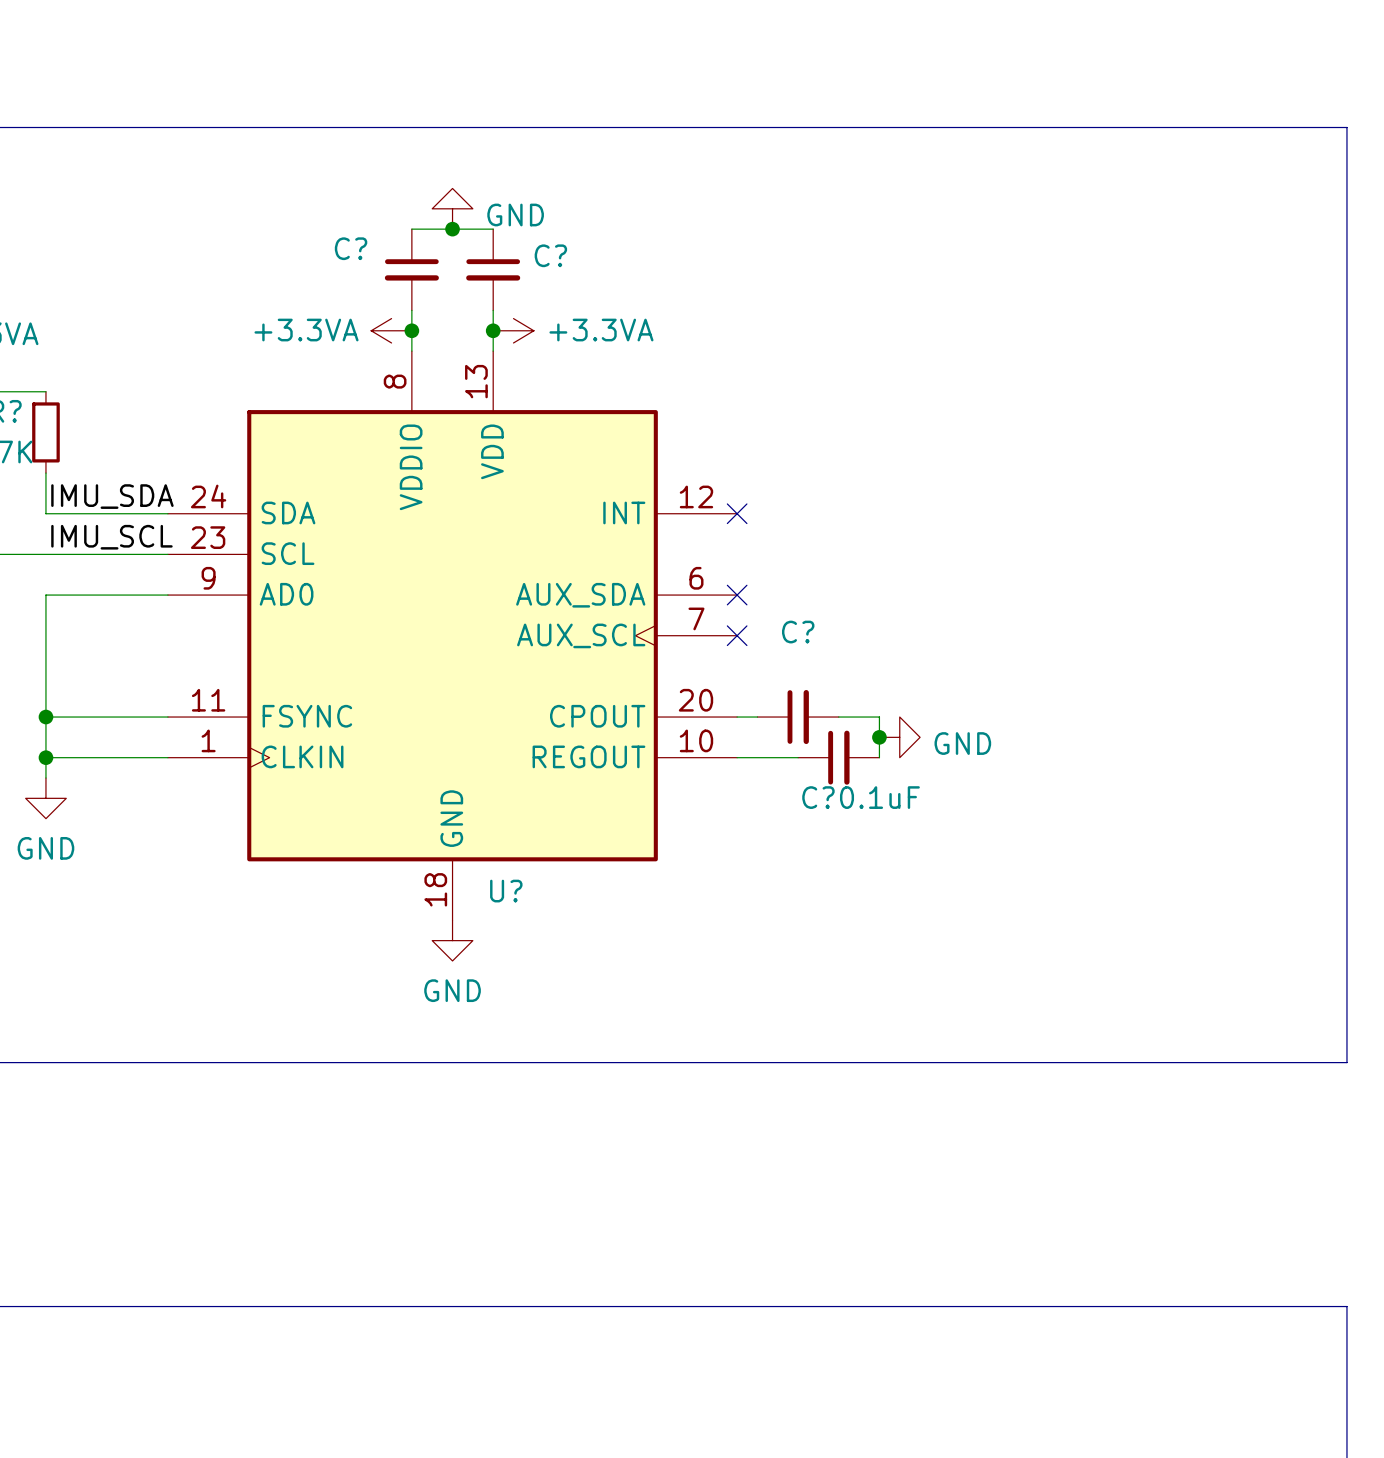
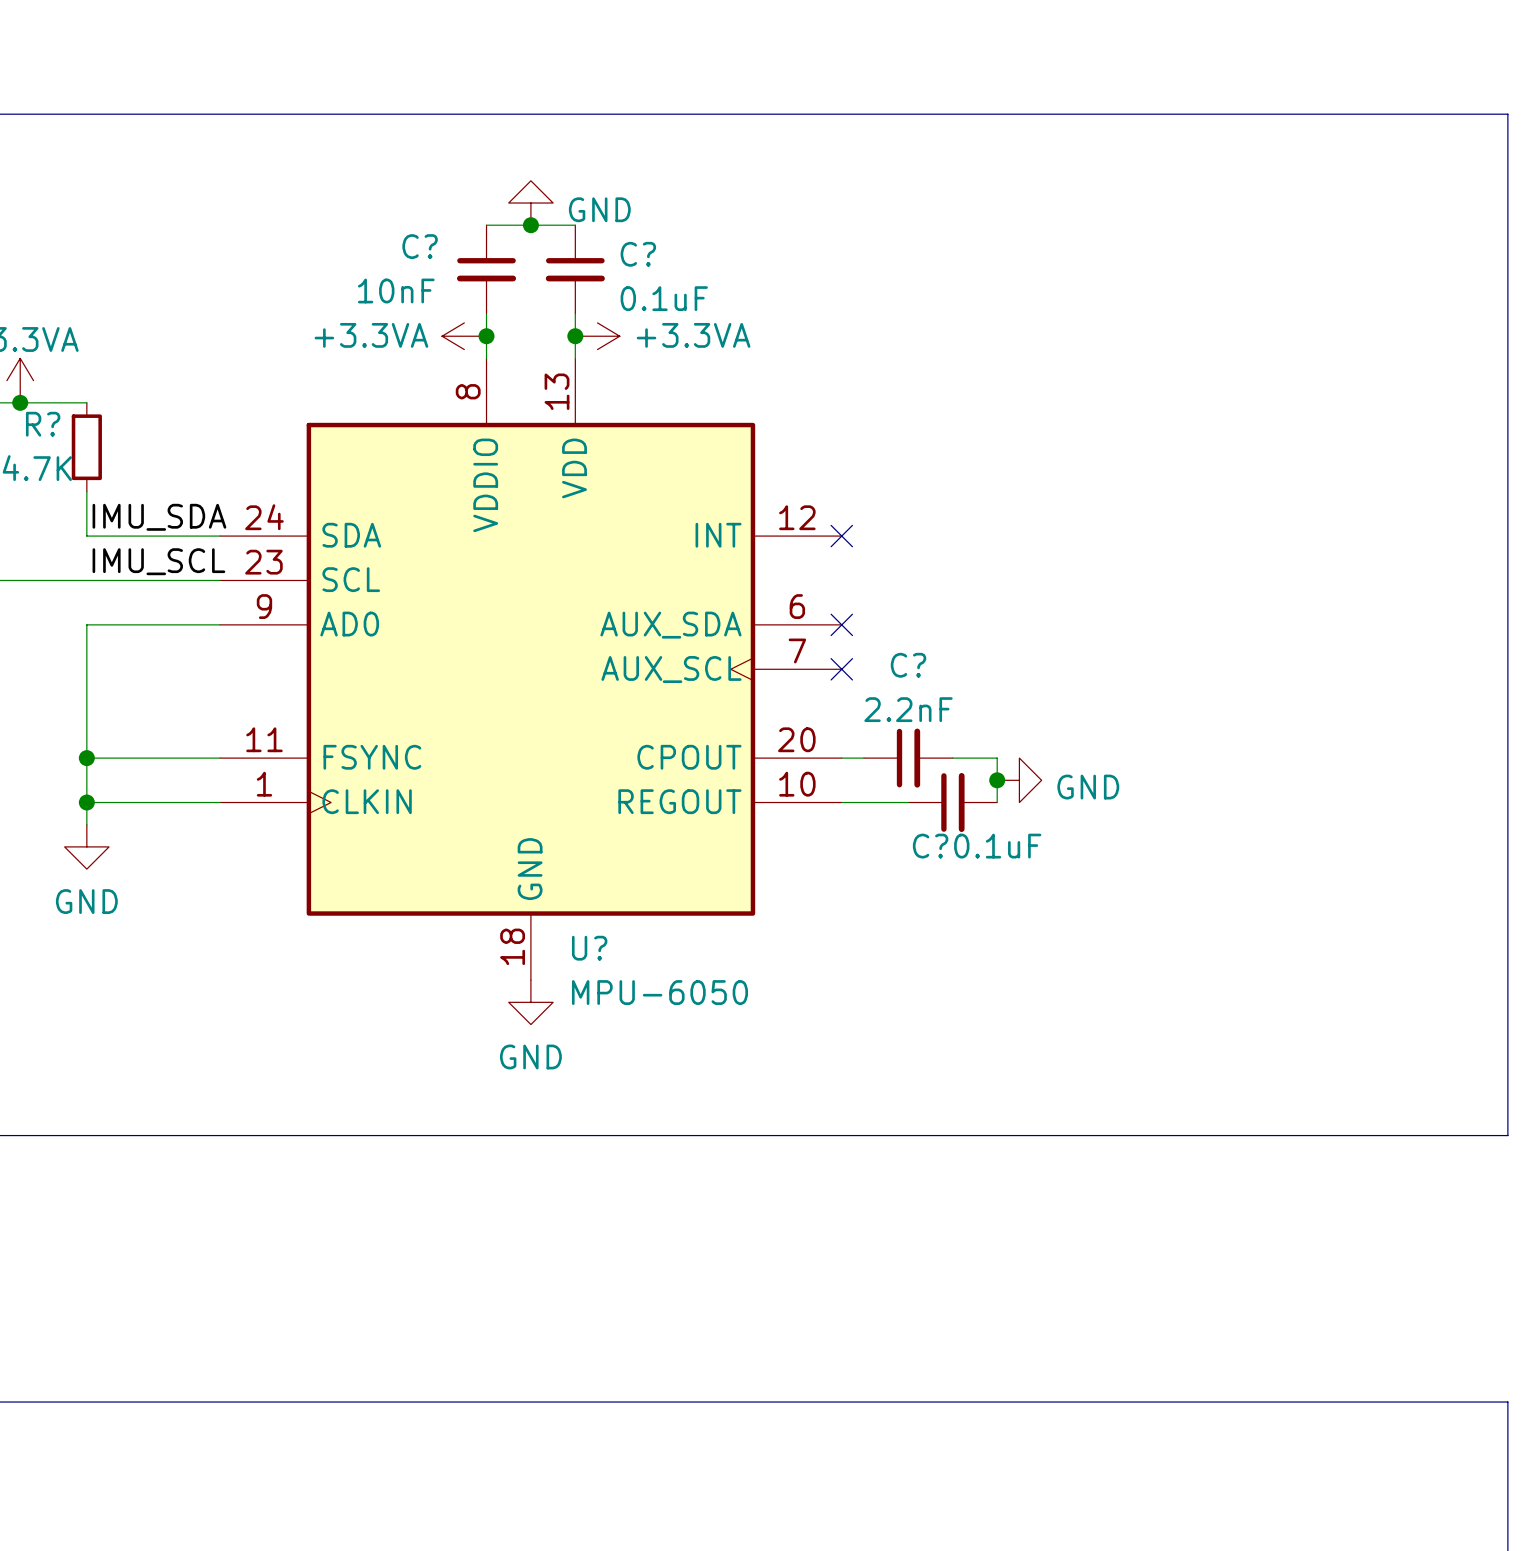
C? value: none -> 10nF (396, 290)
C? value: none -> 0.1uF (664, 298)
C? value: none -> 2.2nF (908, 709)
U? value: none -> MPU-6050 (659, 992)

